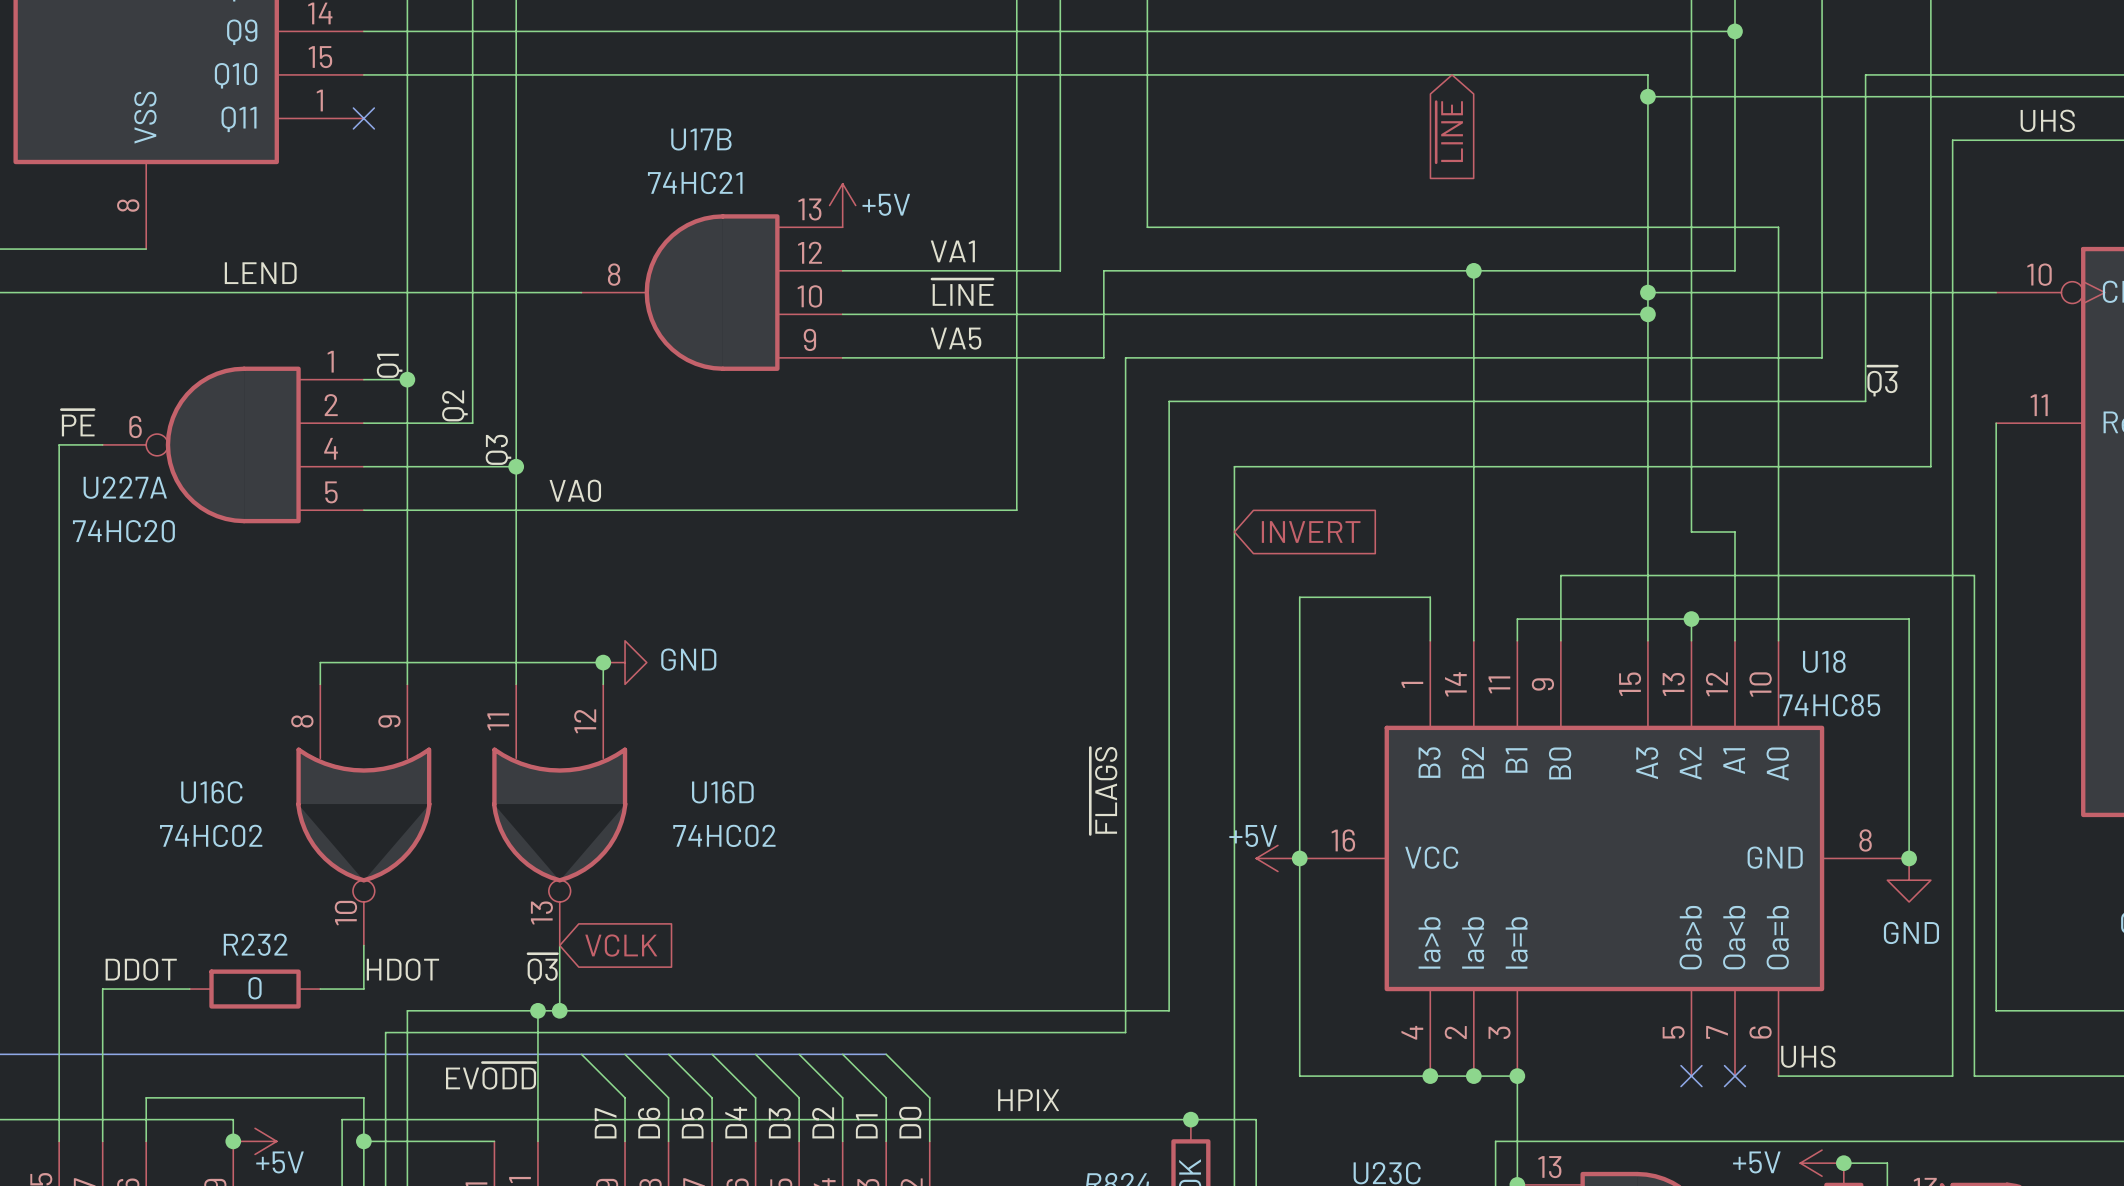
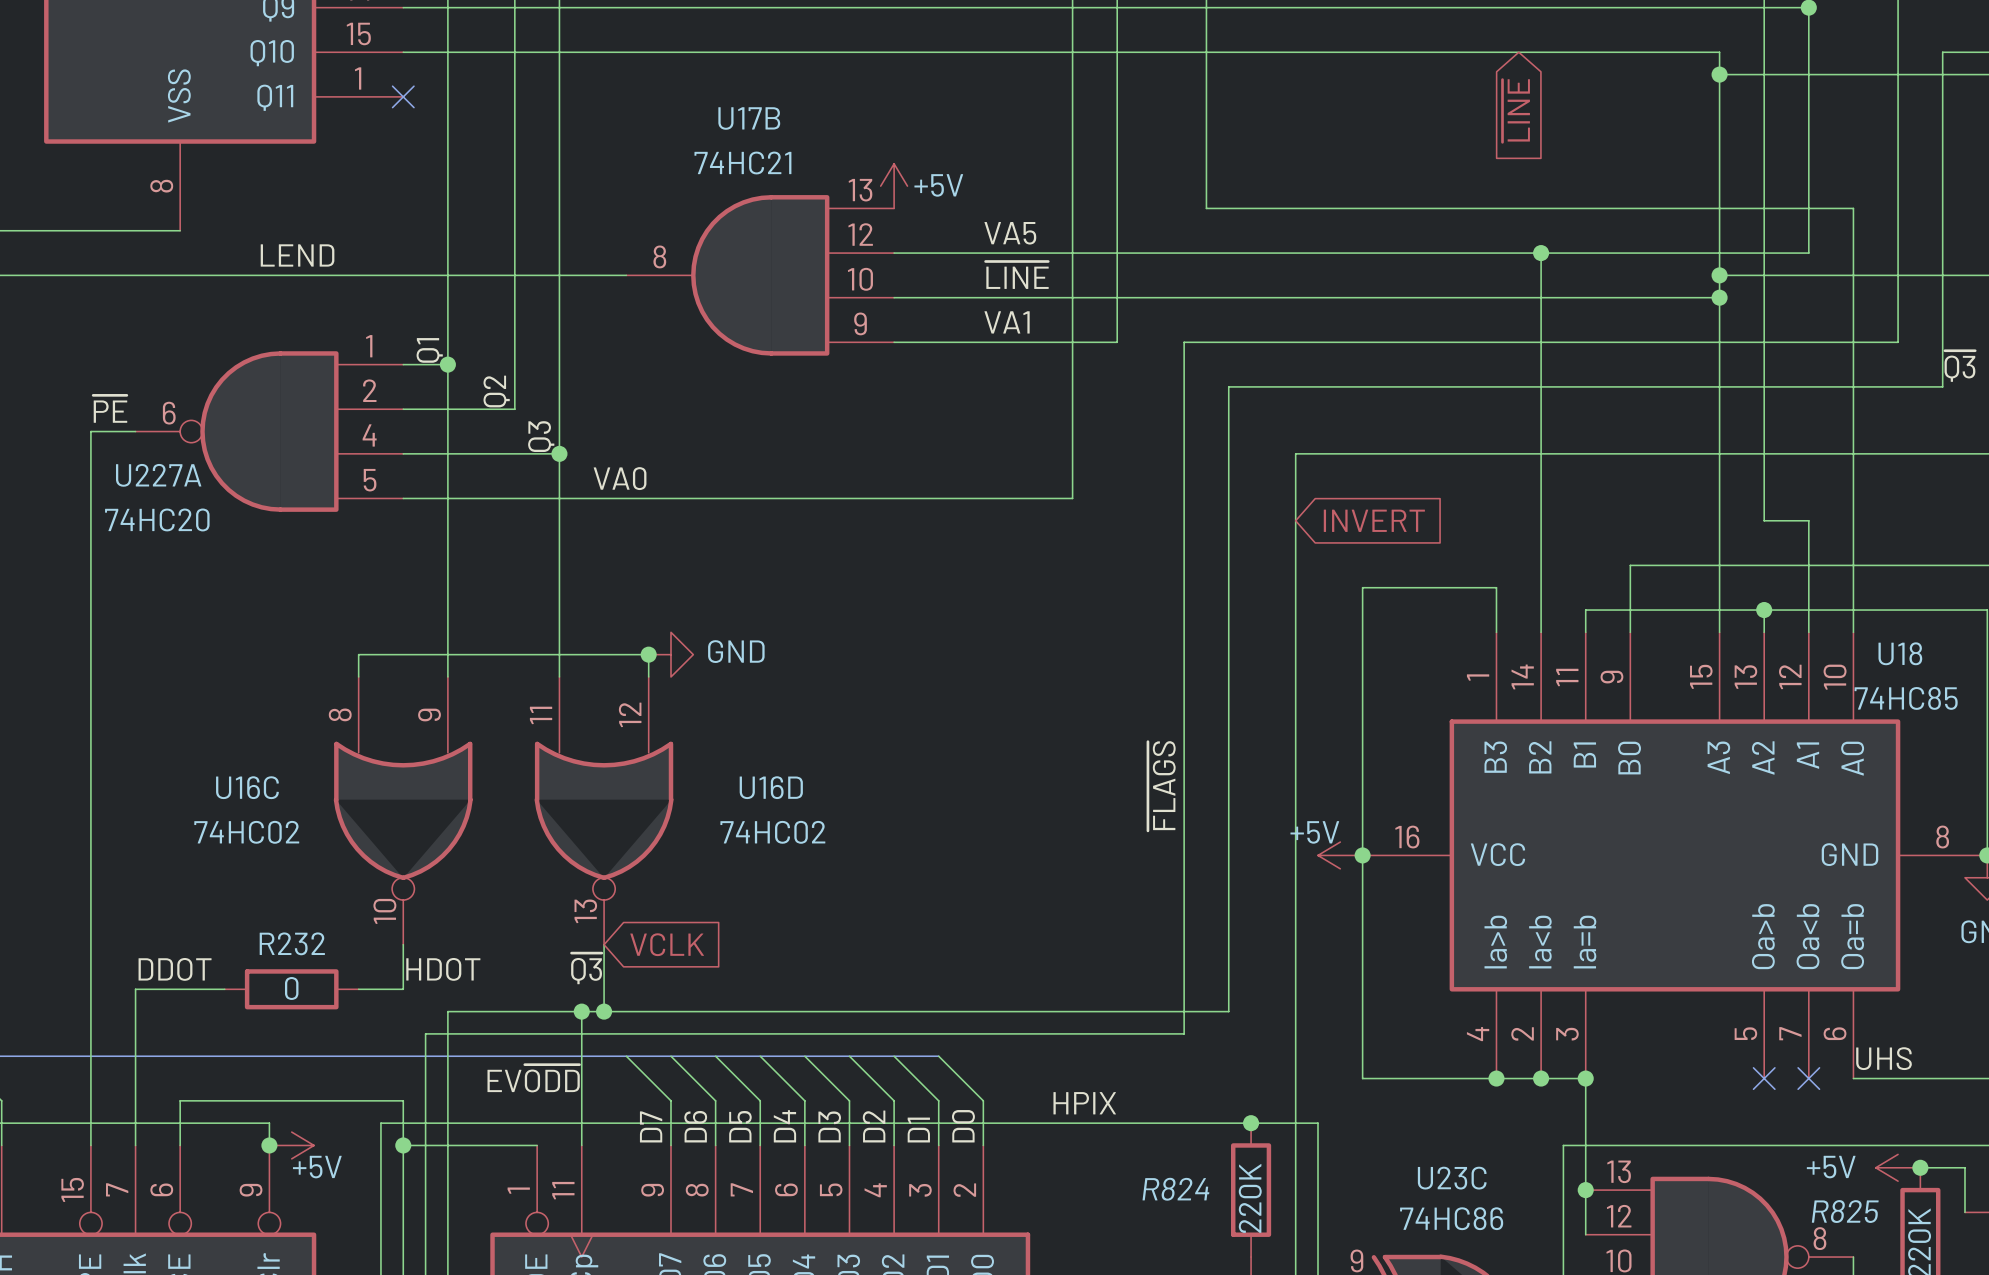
label: VA1 (952, 251) -> VA5 (1010, 233)
wire: (1103, 270) (1103, 357) (1060, 357) -> (1161, 253) (1117, 253) (1117, 342)
label: VA5 (956, 338) -> VA1 (1007, 322)

